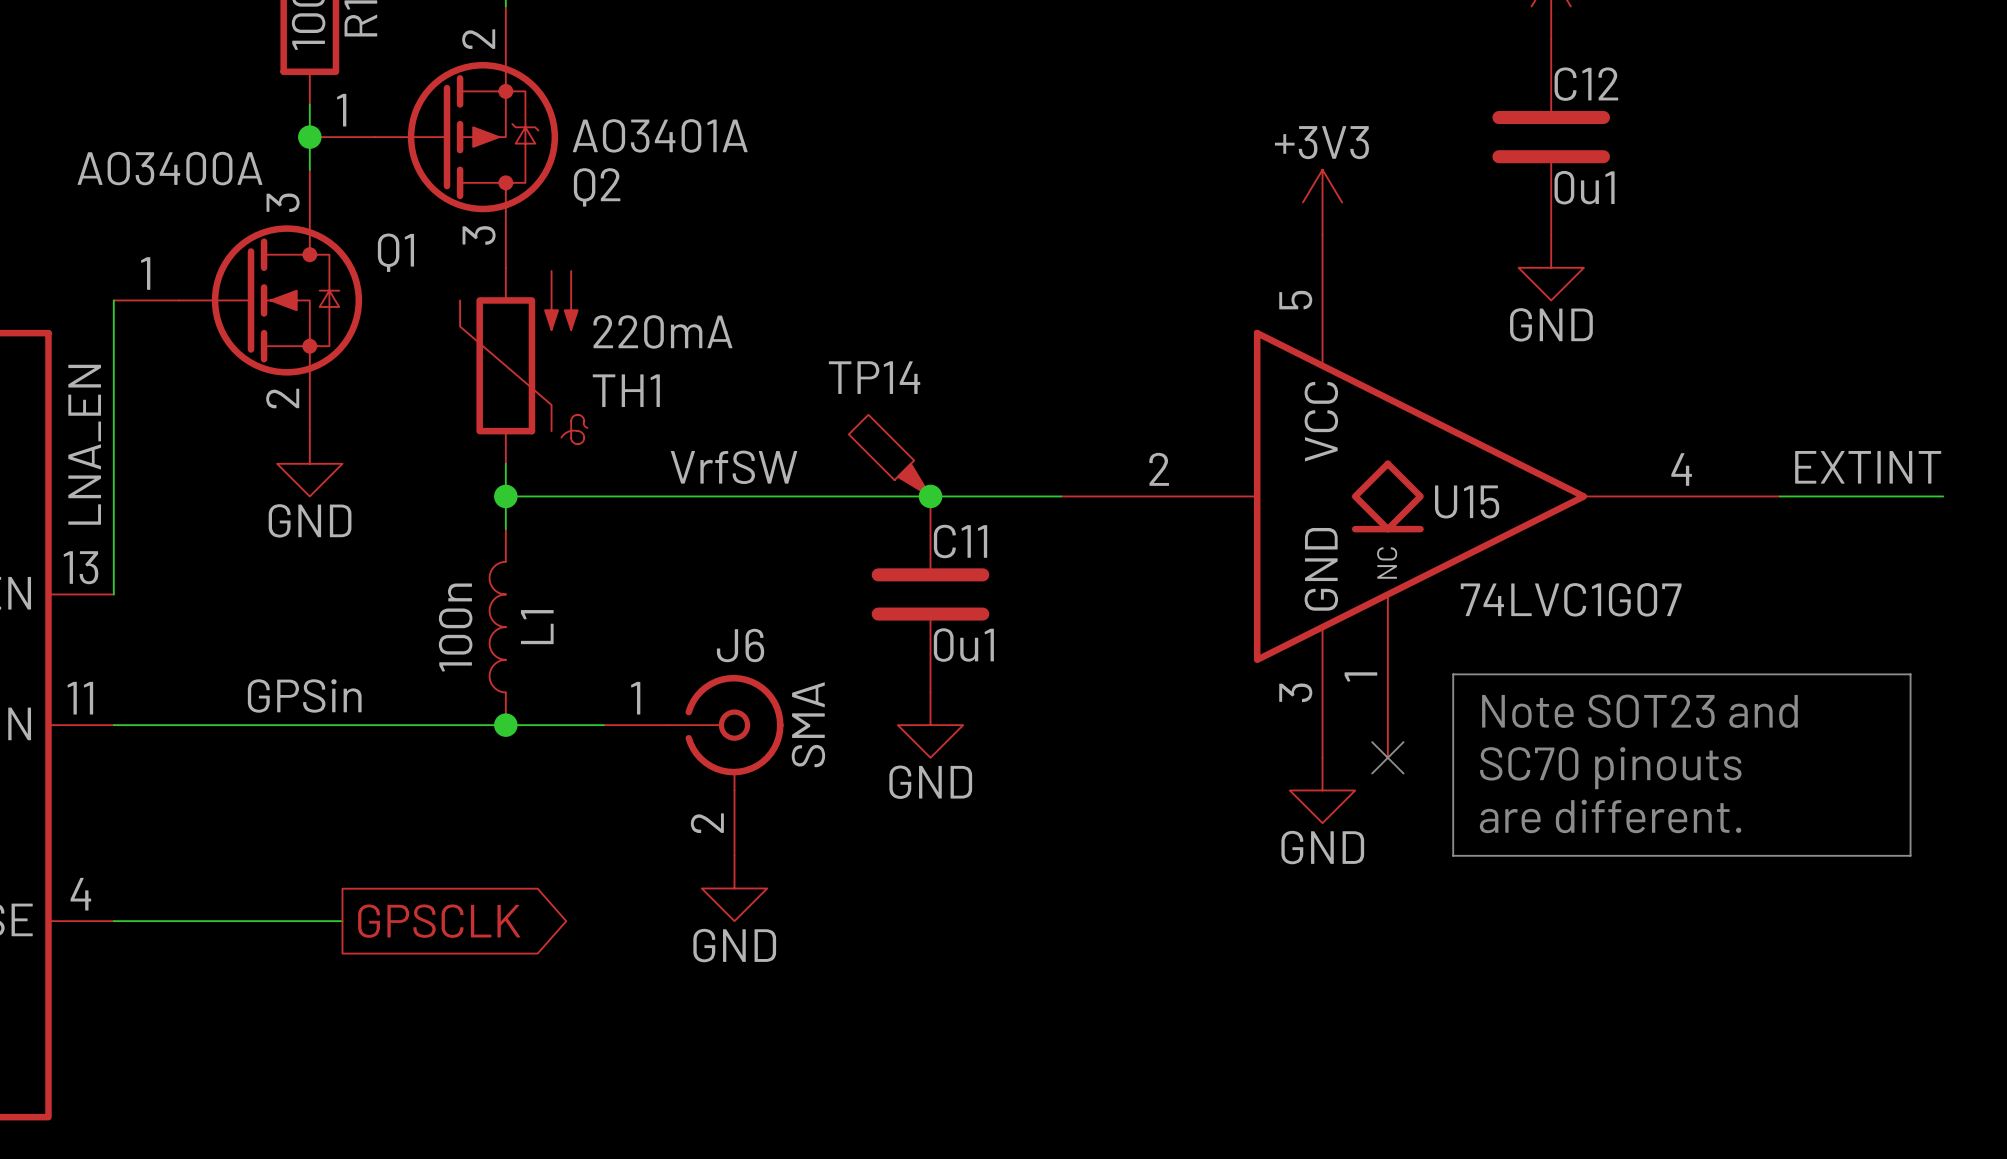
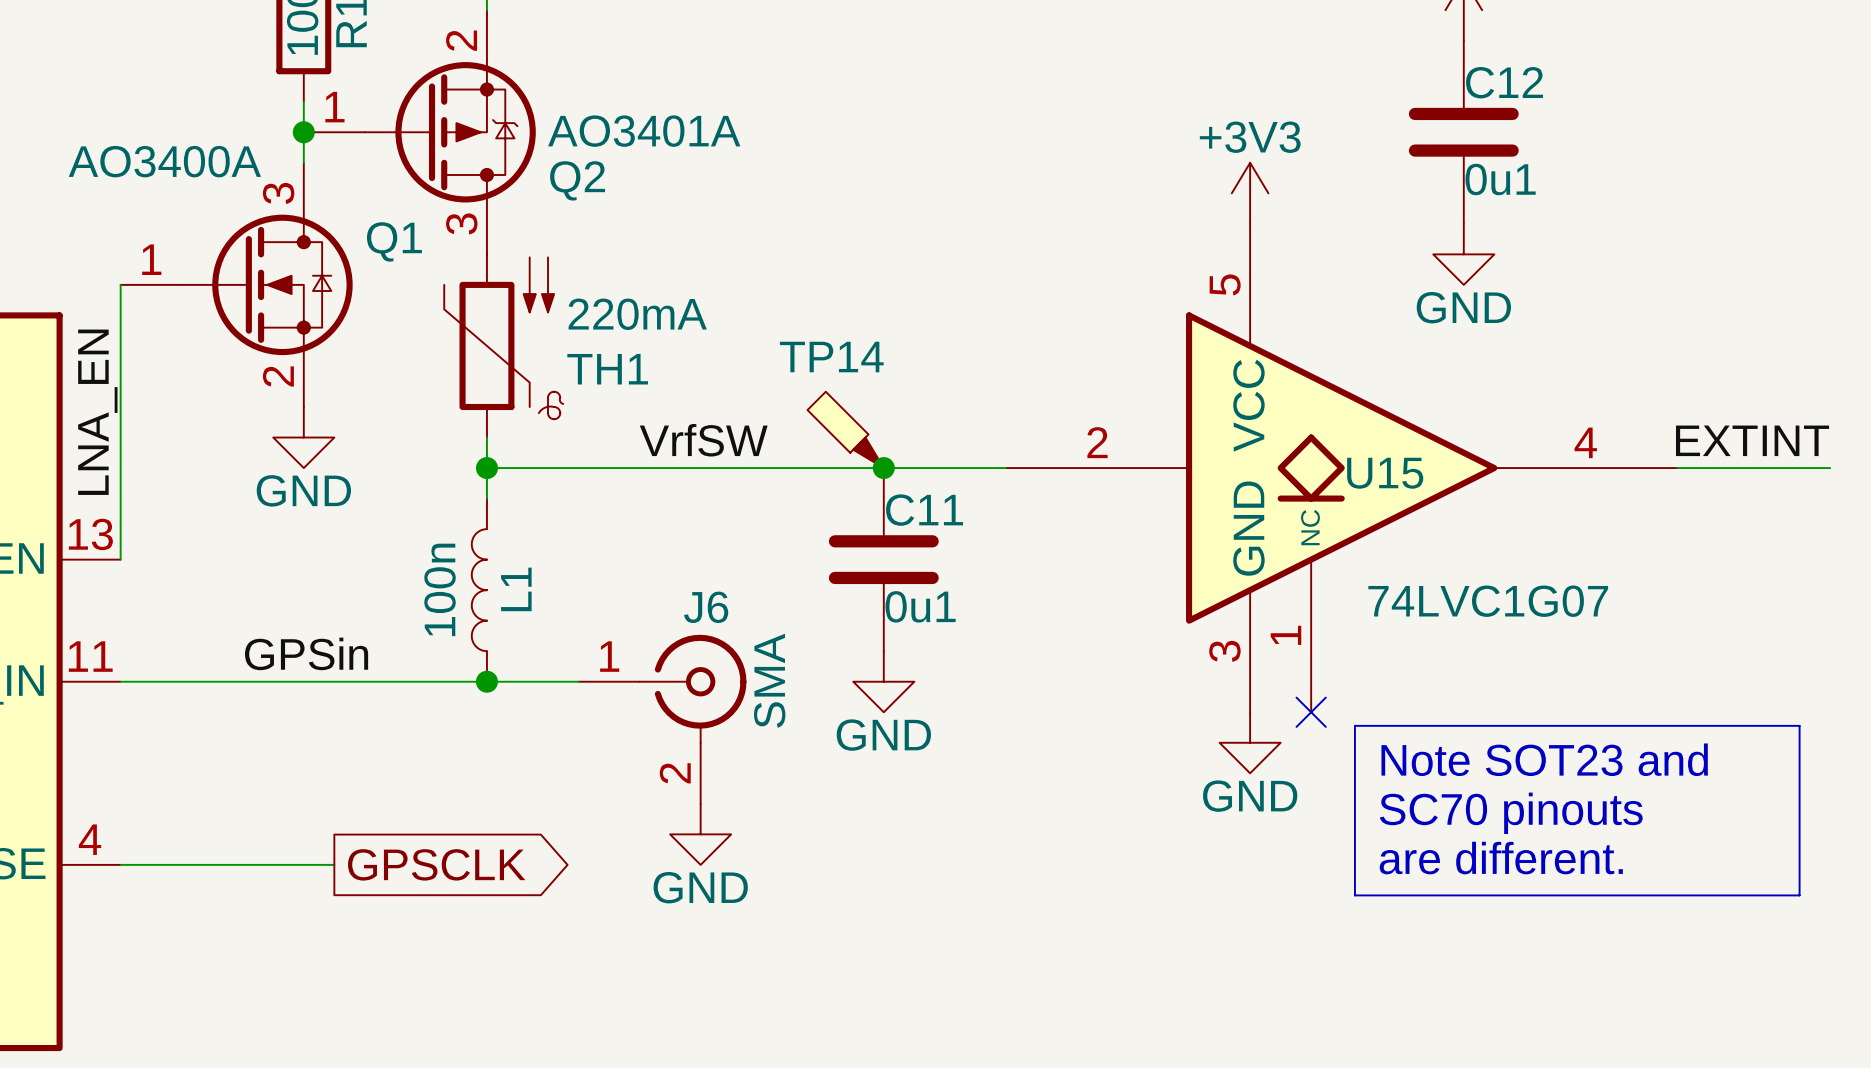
U15 value position: 74LVC1G07 (1571, 599) -> 74LVC1G07 (1488, 601)
text position: Note SOT23 and (1639, 711) -> Note SOT23 and (1544, 759)
text position: SC70 pinouts (1610, 768) -> SC70 pinouts (1511, 813)
line: (1910, 772) (1910, 674) (1453, 674) (1453, 855) (1910, 855) -> (1799, 725) (1354, 725) (1354, 895) (1799, 895) (1799, 803)
text position: are different. (1610, 816) -> are different. (1501, 858)

